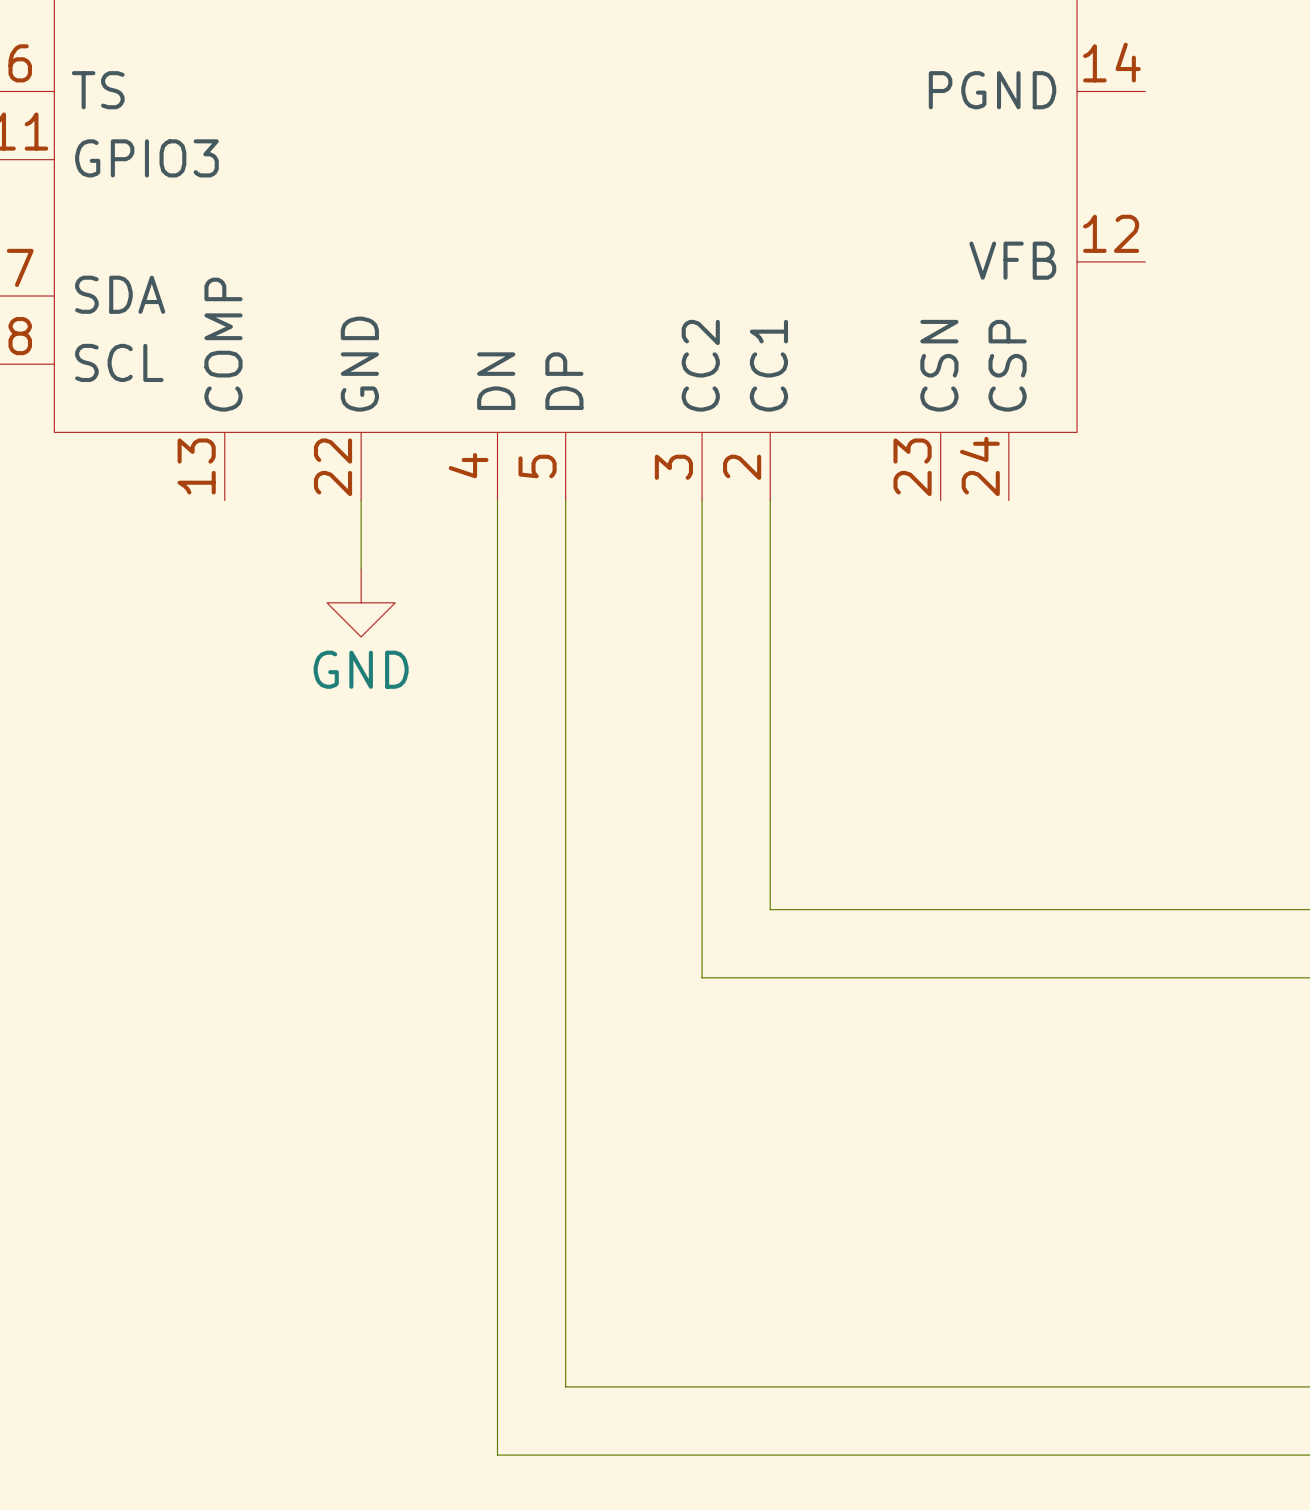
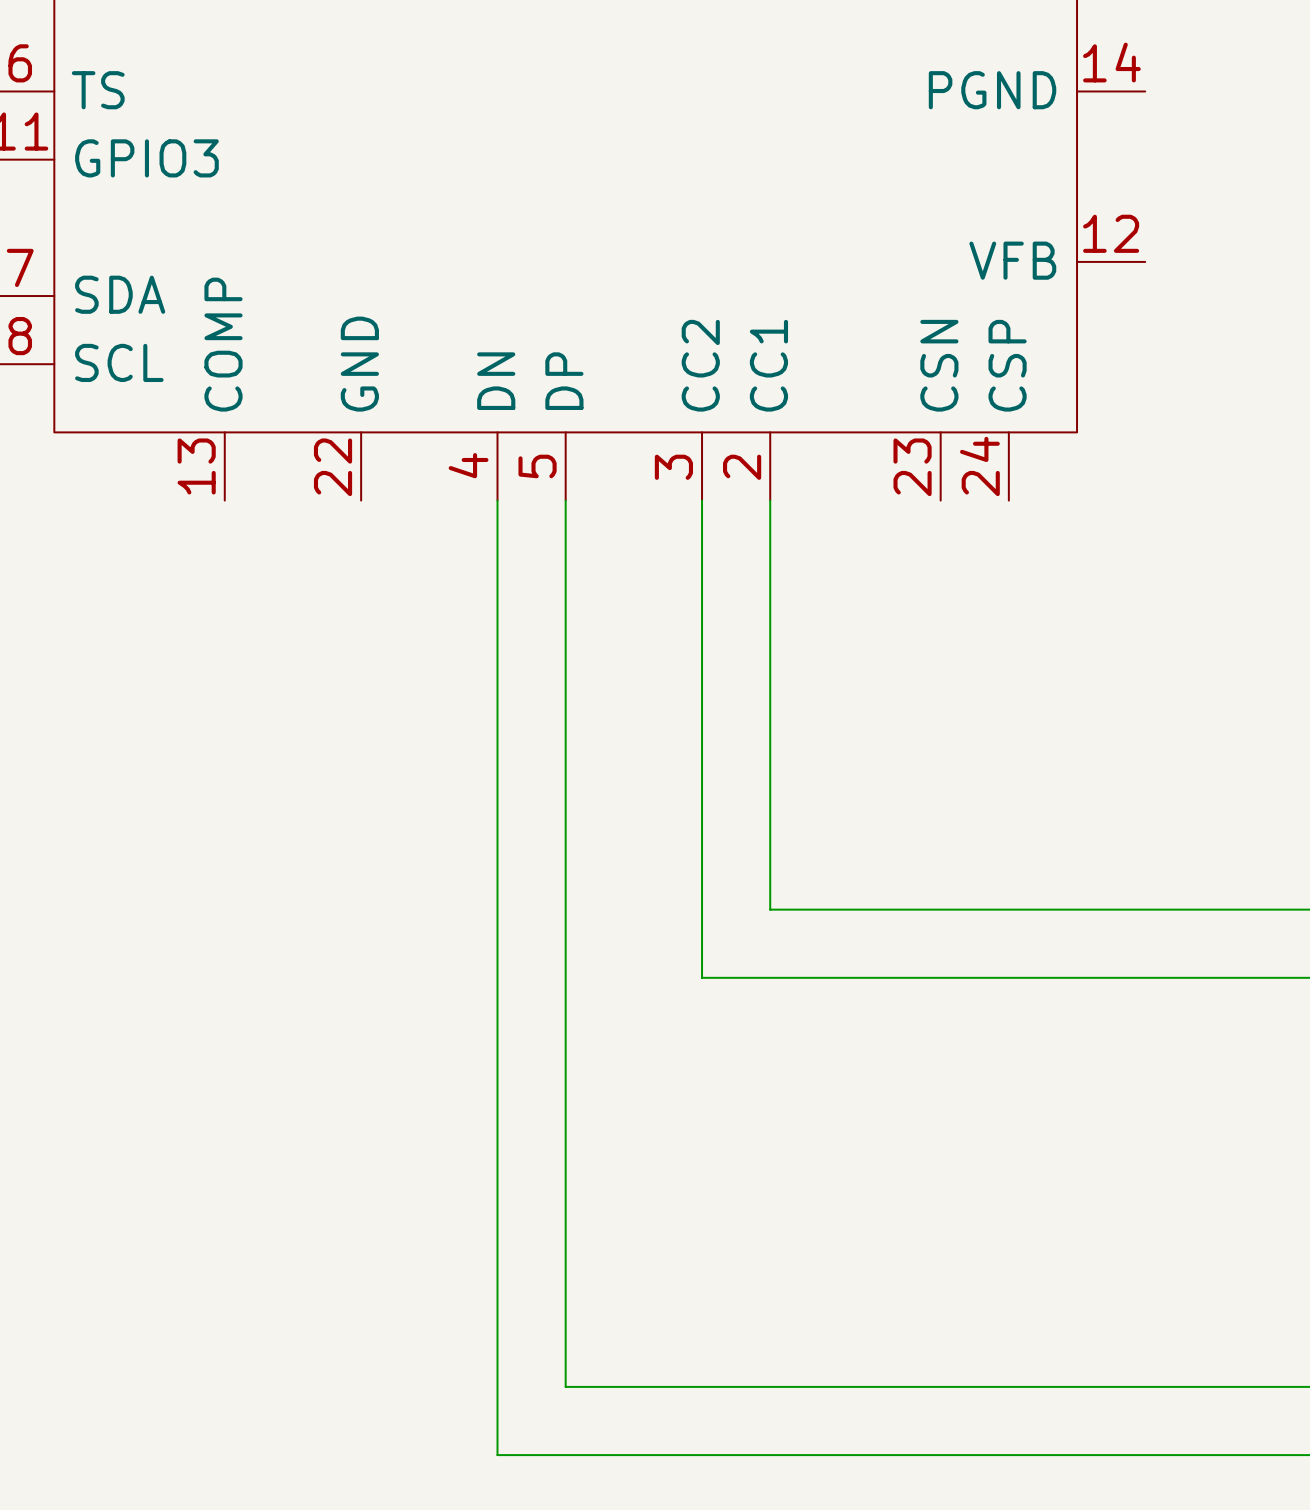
wire: (361, 500) (361, 568) -> none
power symbol: GND (361, 602) -> none

